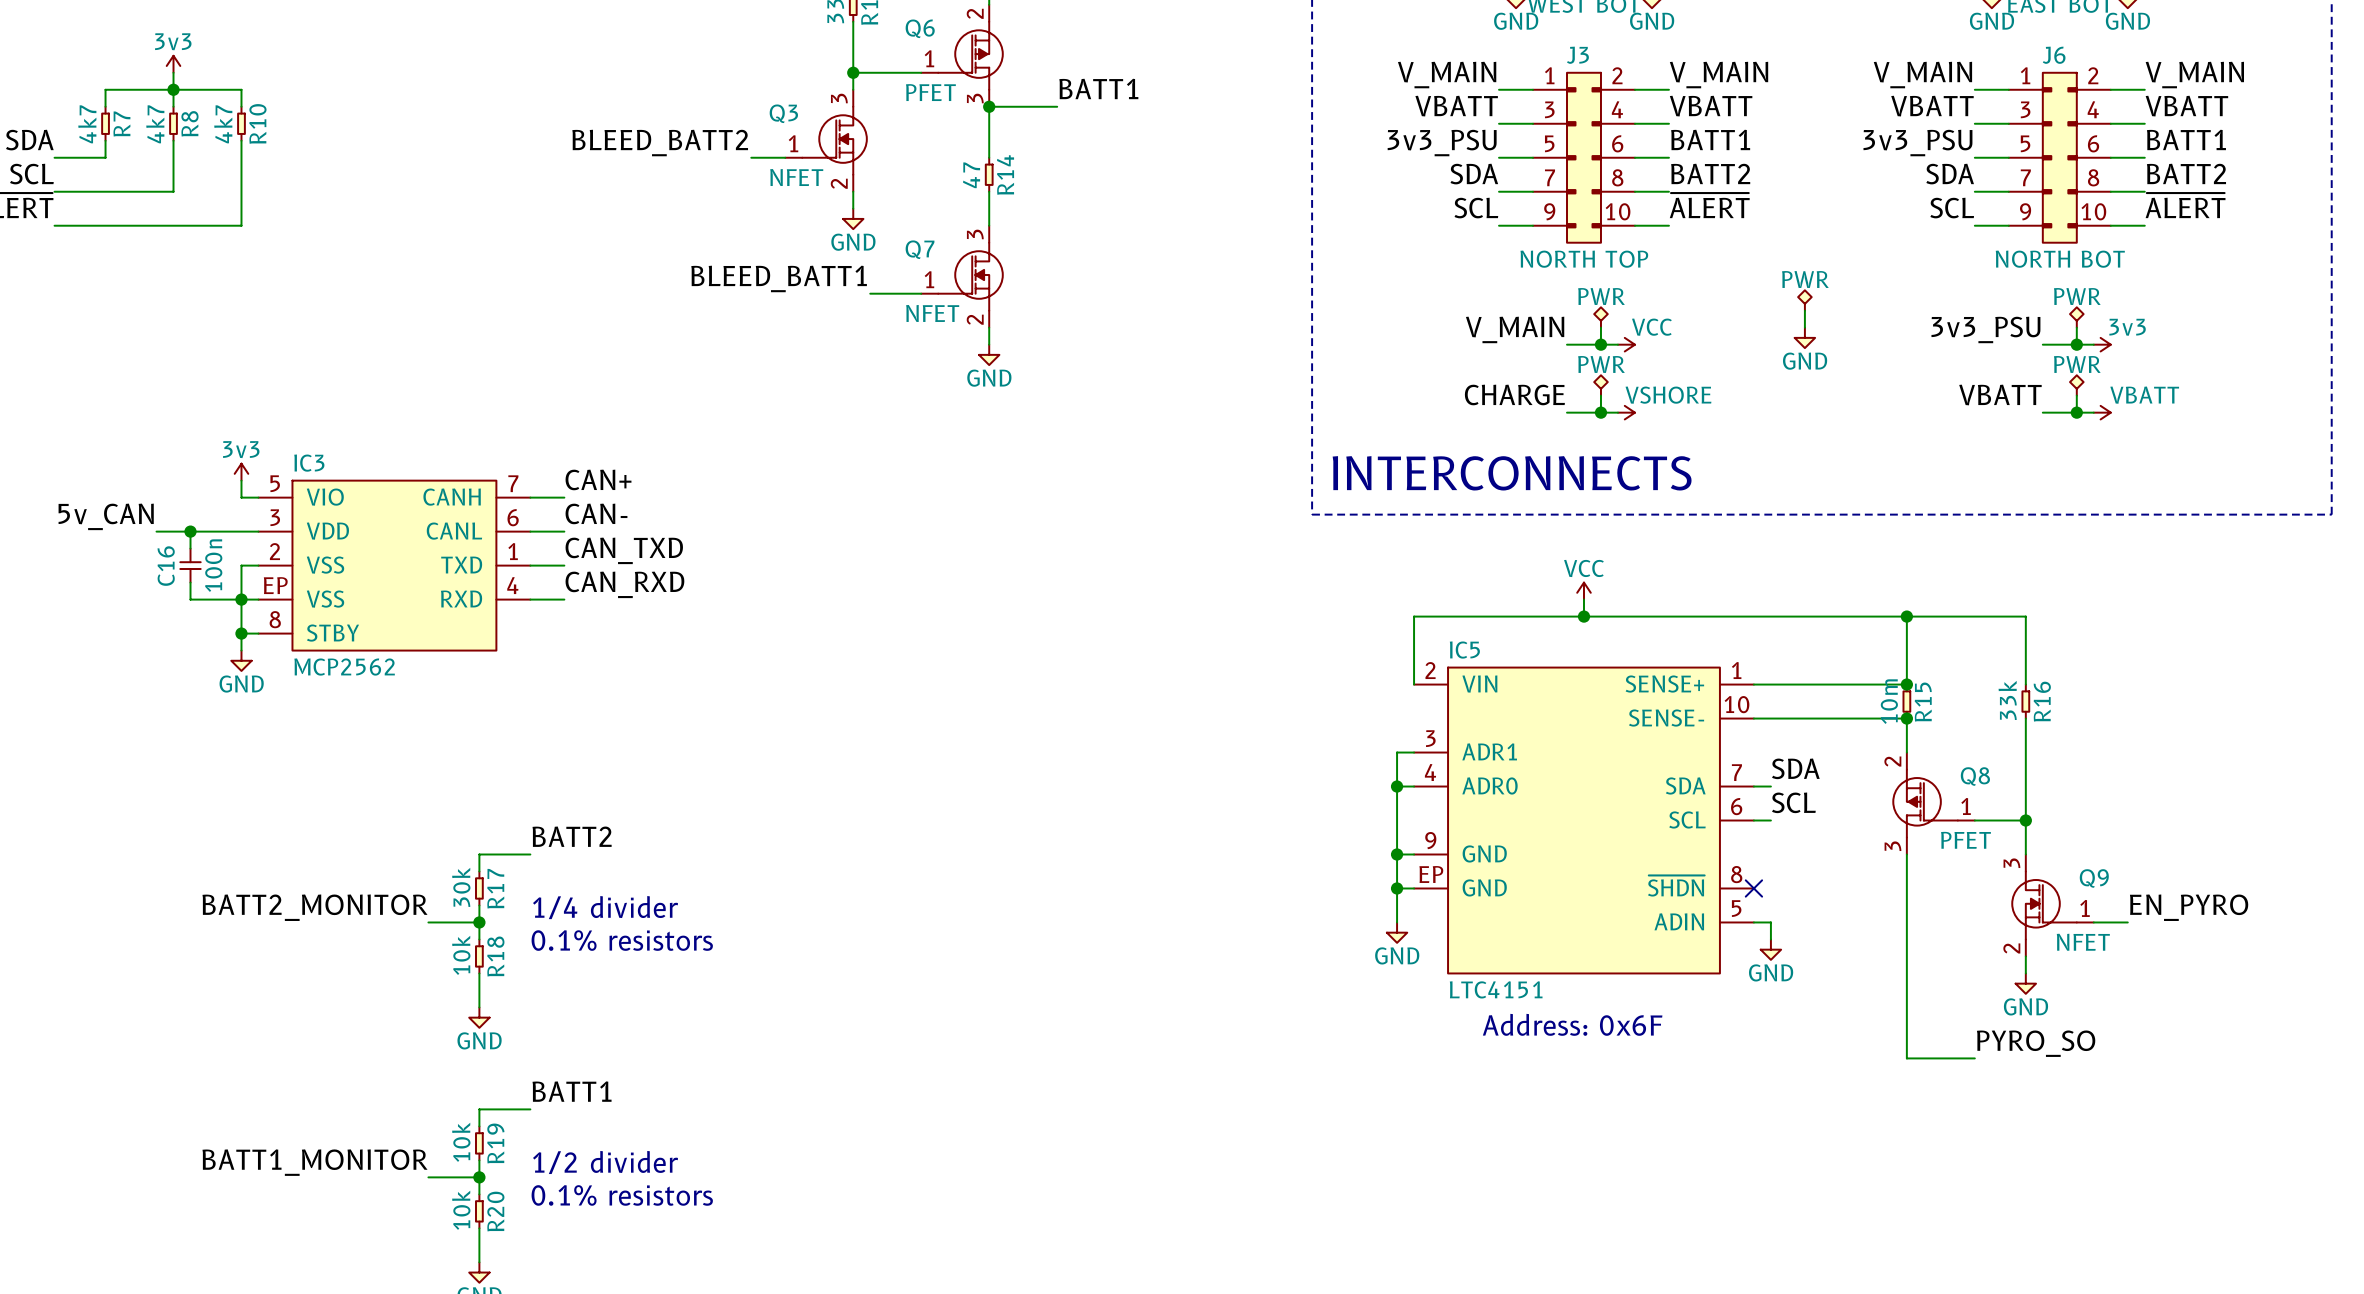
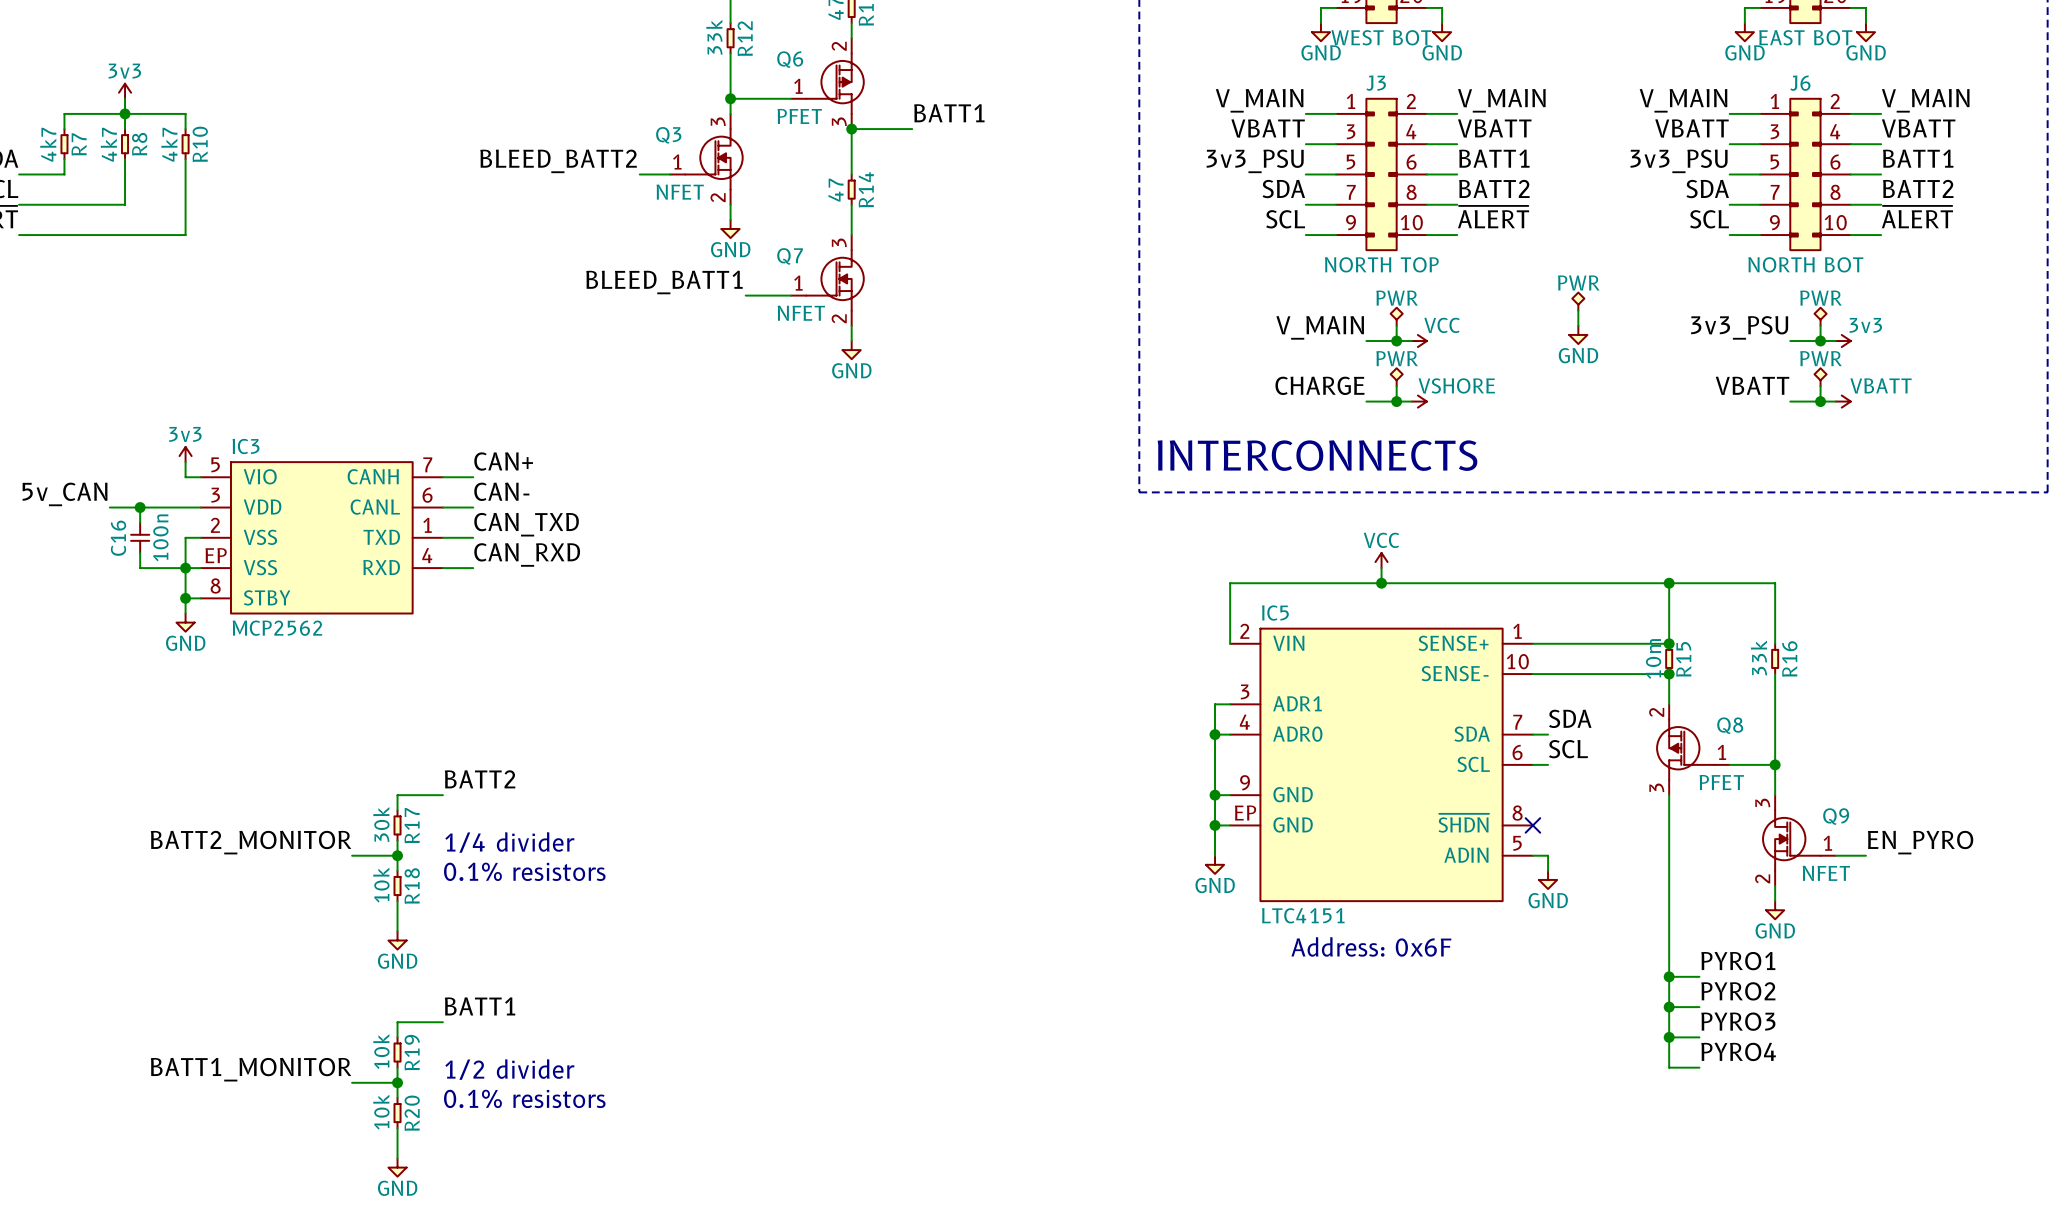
label: none -> PYRO1 (1738, 961)
label: PYRO_SO (2036, 1043) -> none
wire: none -> (1669, 976) (1669, 1067) (1699, 1067)
junction: none -> (1669, 976)
wire: (1940, 1058) (1974, 1058) -> (1669, 1007) (1699, 1007)
label: none -> PYRO2 (1738, 991)
junction: none -> (1669, 1007)
label: none -> PYRO3 (1738, 1021)
wire: none -> (1669, 1037) (1699, 1037)
junction: none -> (1669, 1037)
label: none -> PYRO4 (1738, 1051)

